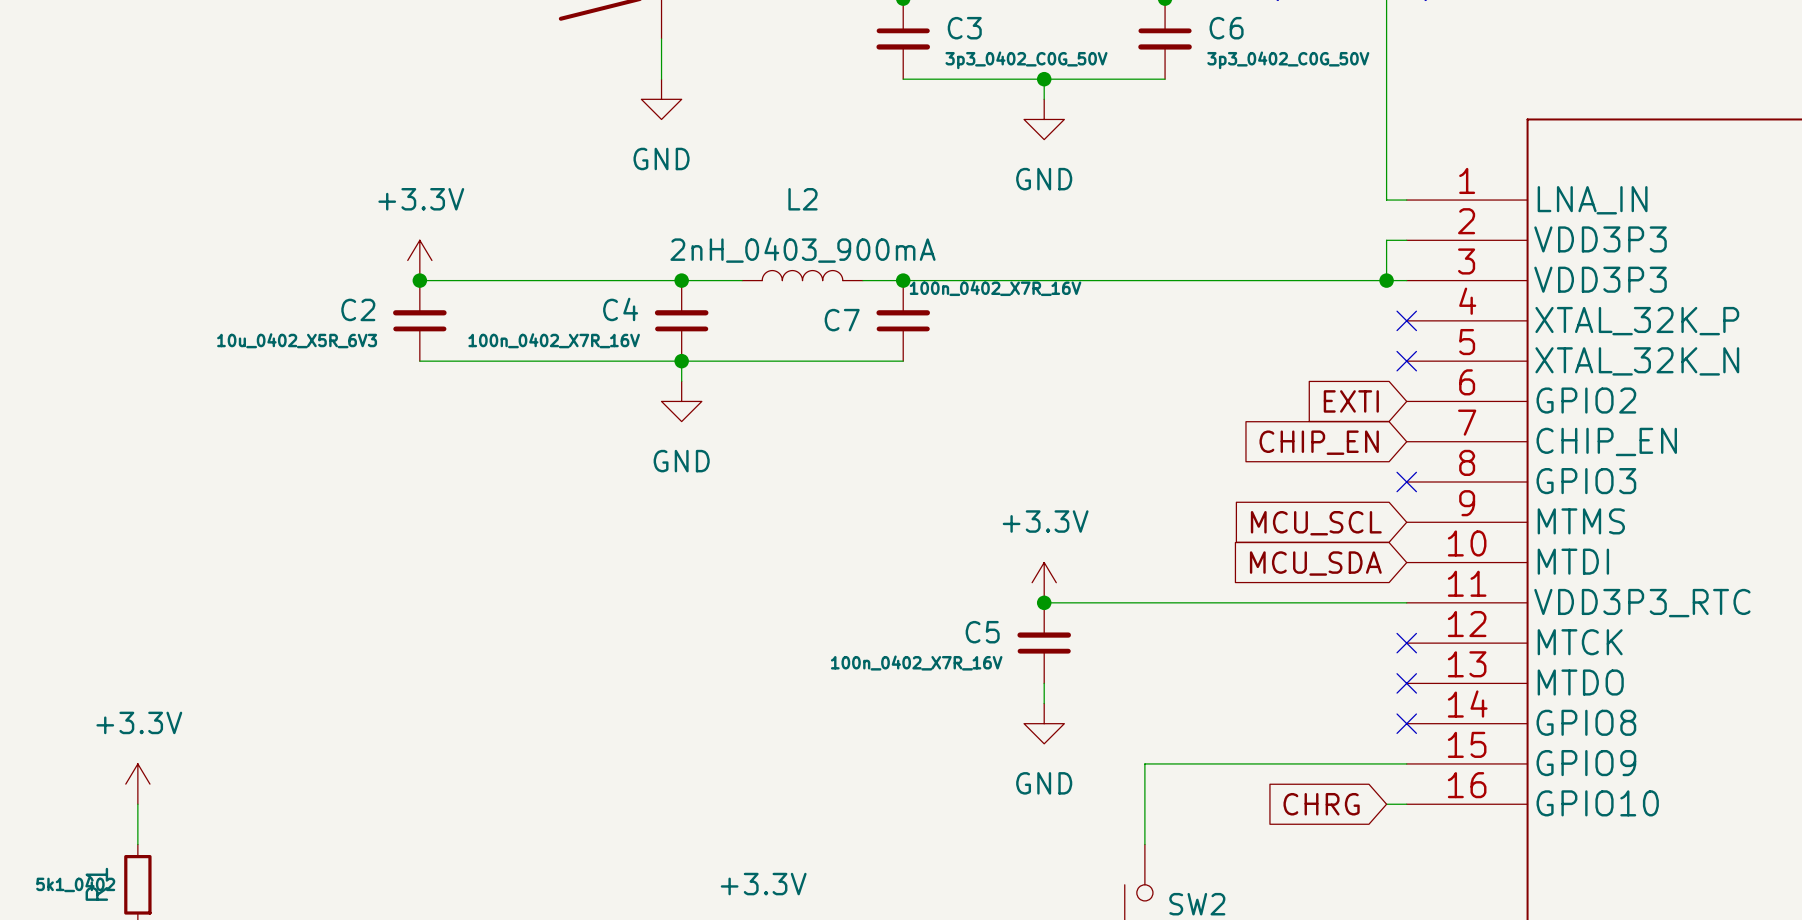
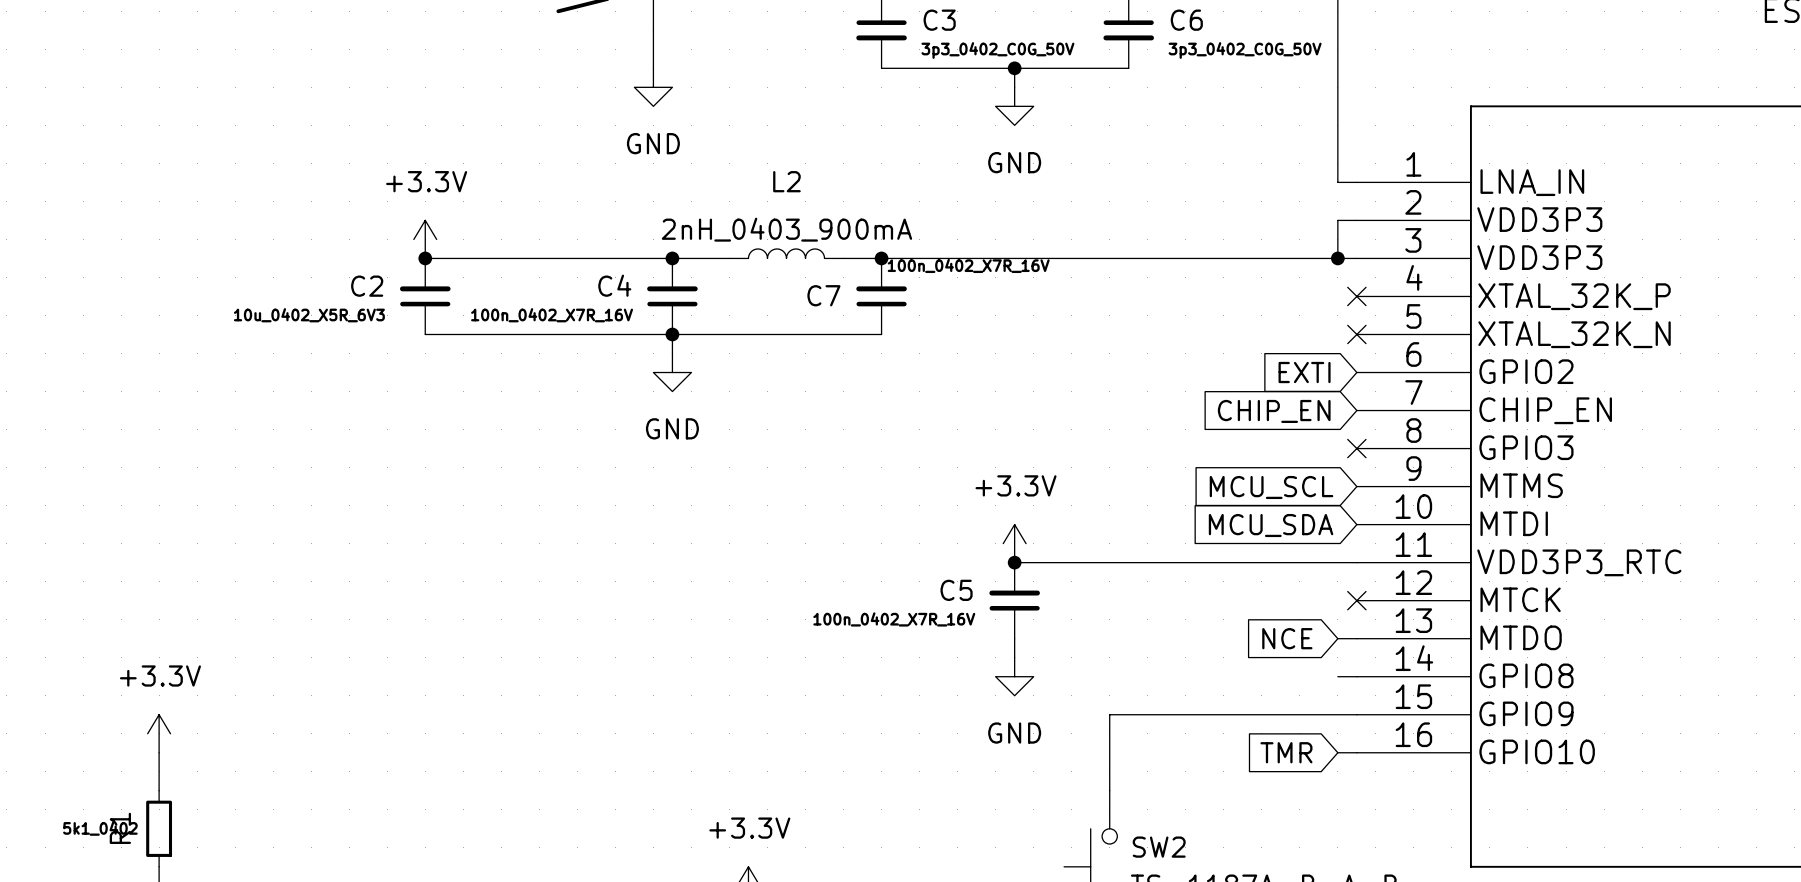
global label: none -> NCE (1287, 638)
wire: none -> (1337, 638) (1356, 638)
no-connect mark: (1406, 683) -> none
wire: none -> (1337, 676) (1356, 676)
no-connect mark: (1406, 723) -> none
global label: CHRG (1321, 804) -> TMR (1286, 752)

